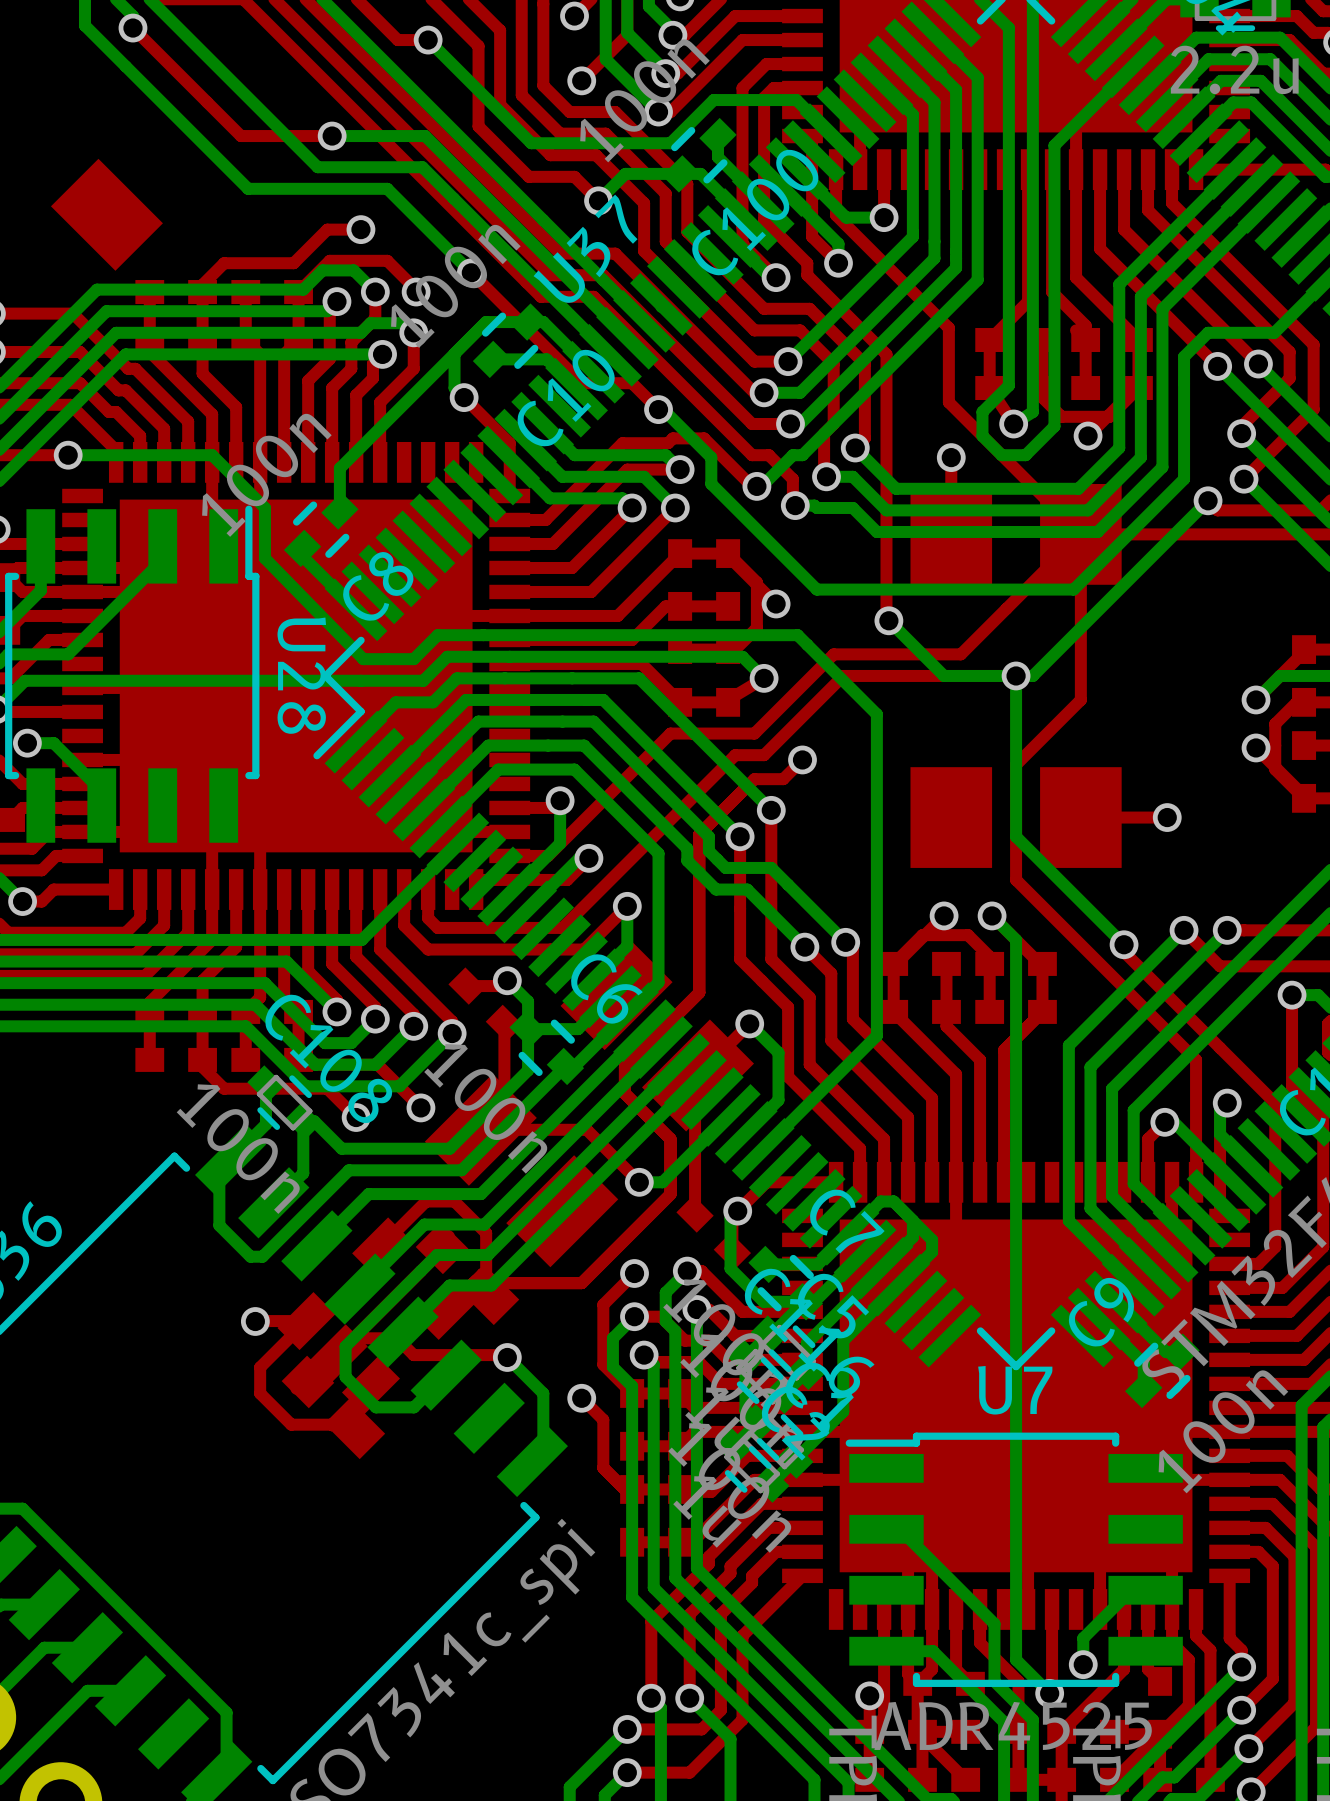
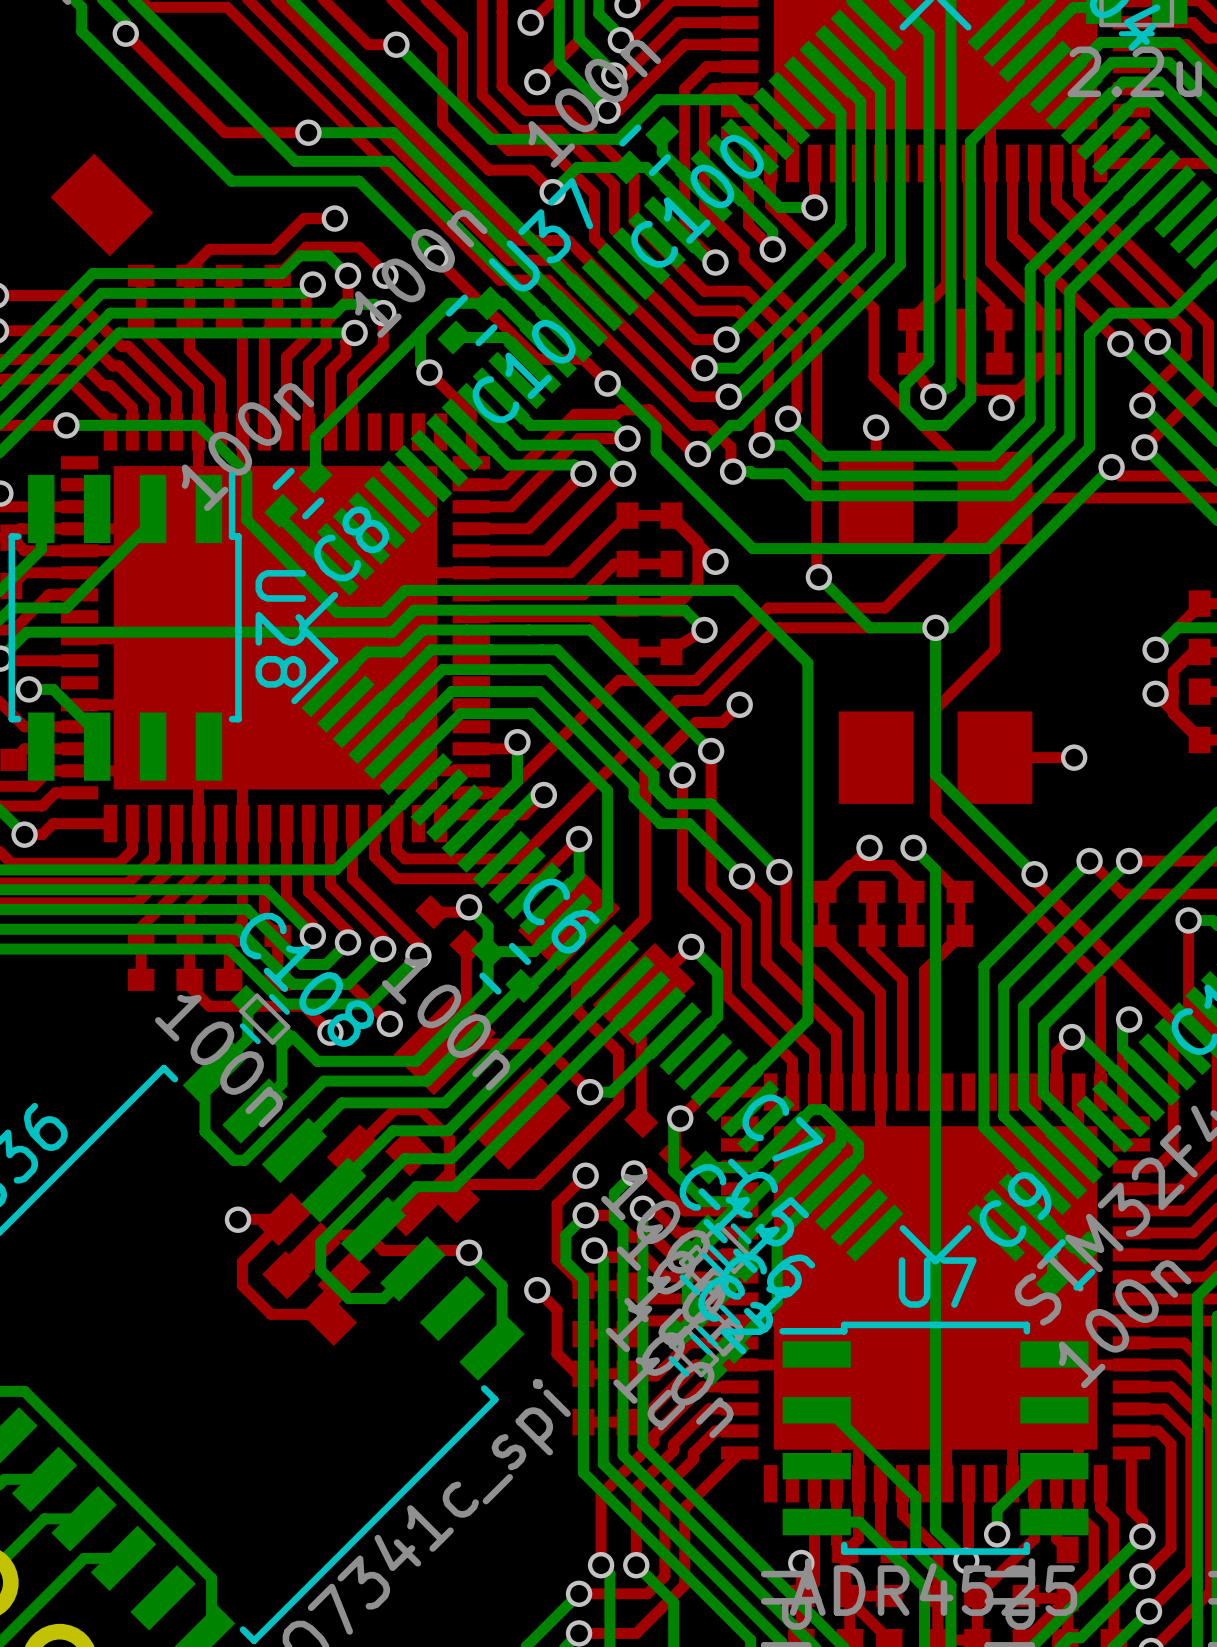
bottom track: (876, 1035) (763, 1149) -> (807, 957) (807, 1019) (734, 1093)

